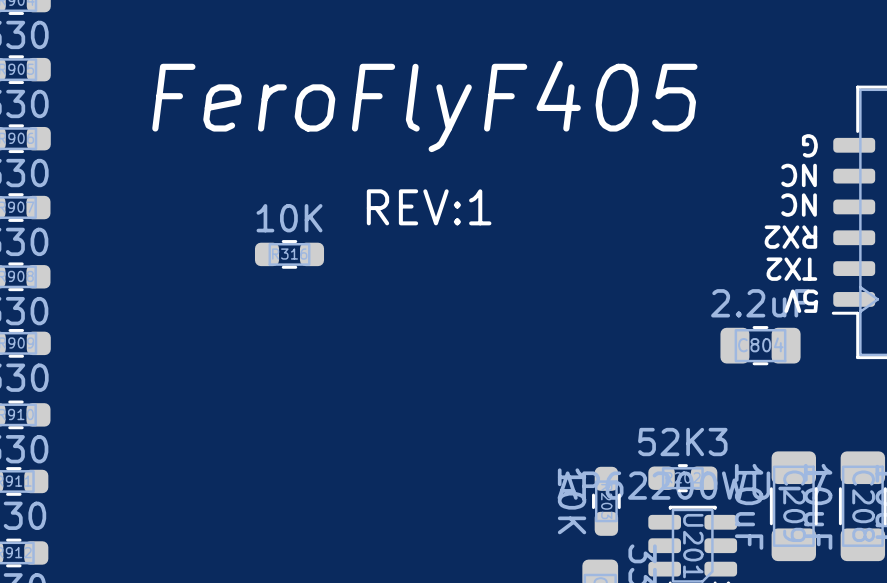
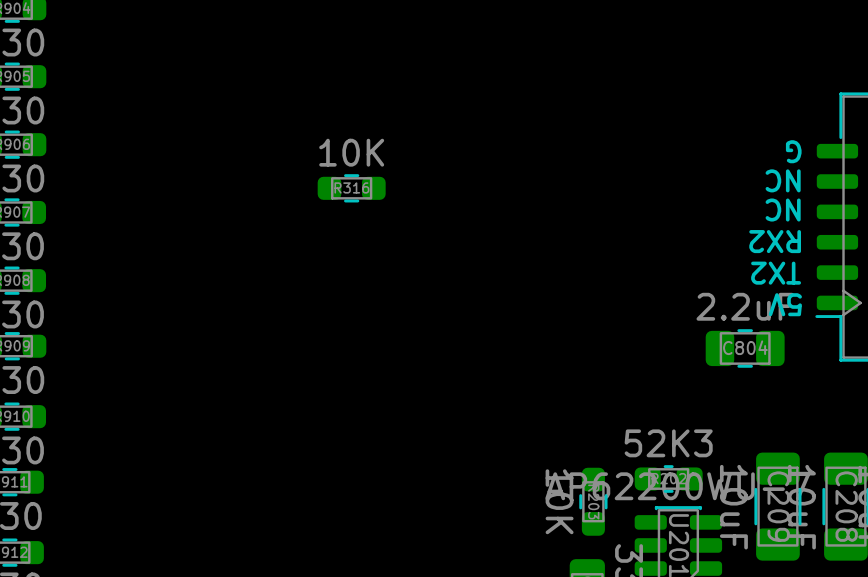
text: FeroFlyF405 (424, 106) -> none
text: REV:1 (429, 207) -> none
R316 position: (289, 254) -> (351, 188)

